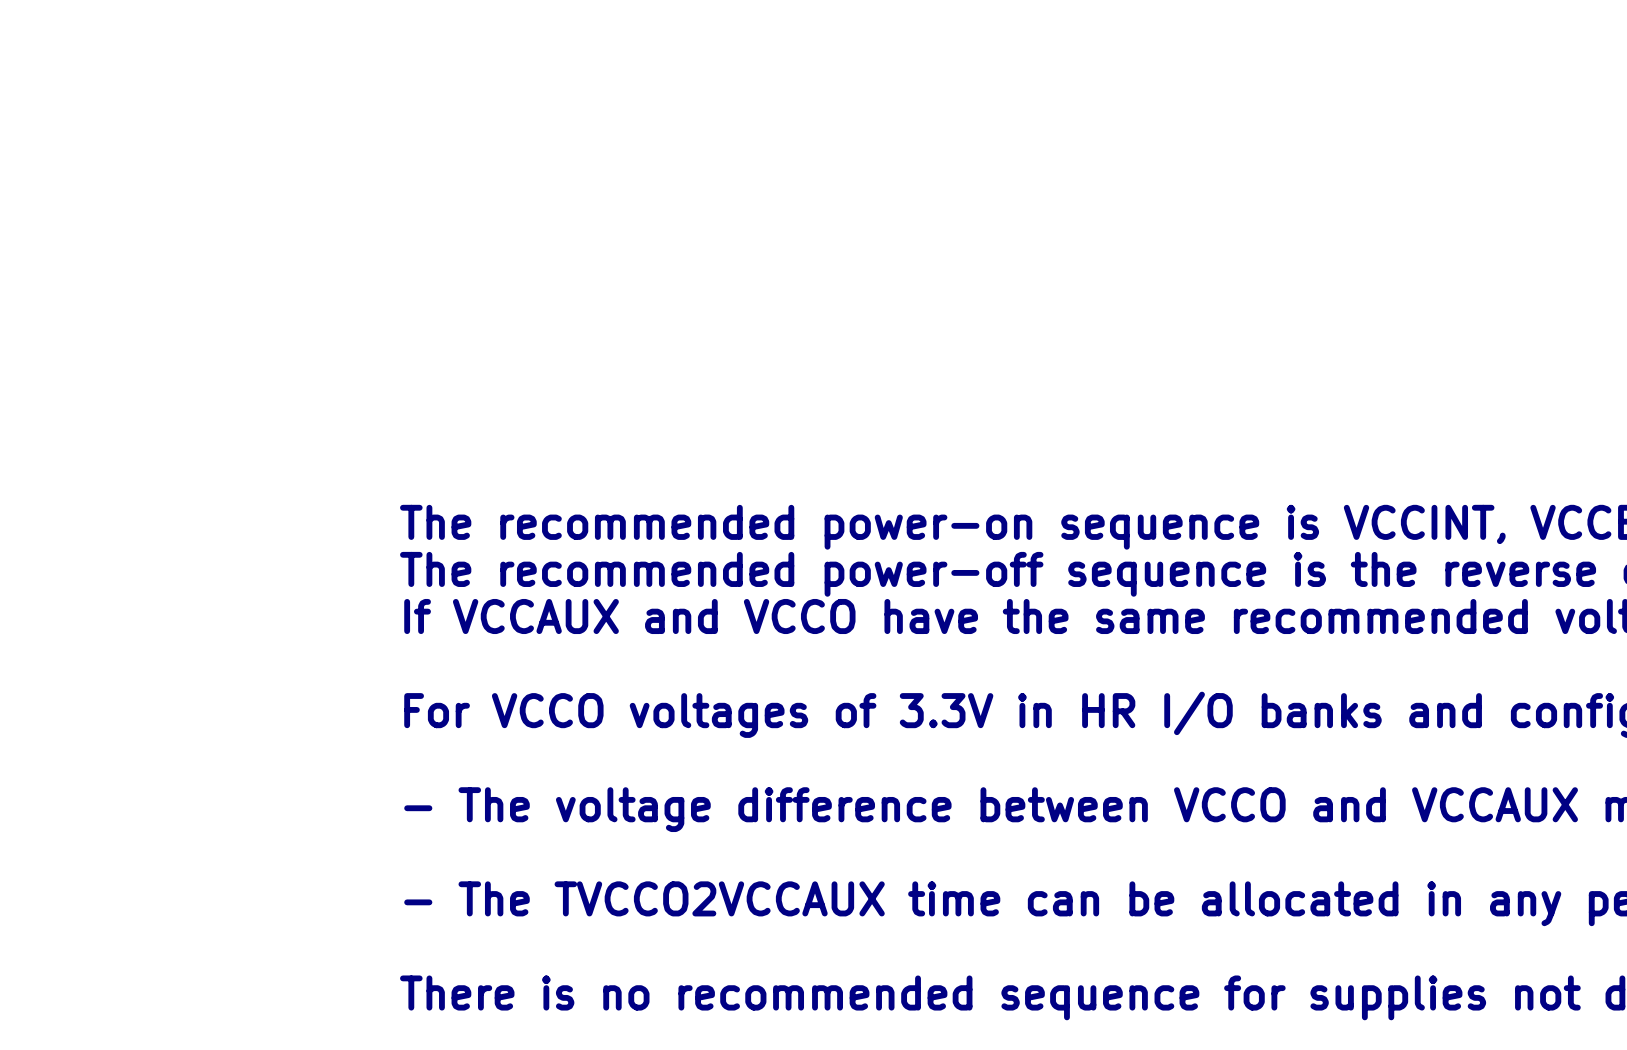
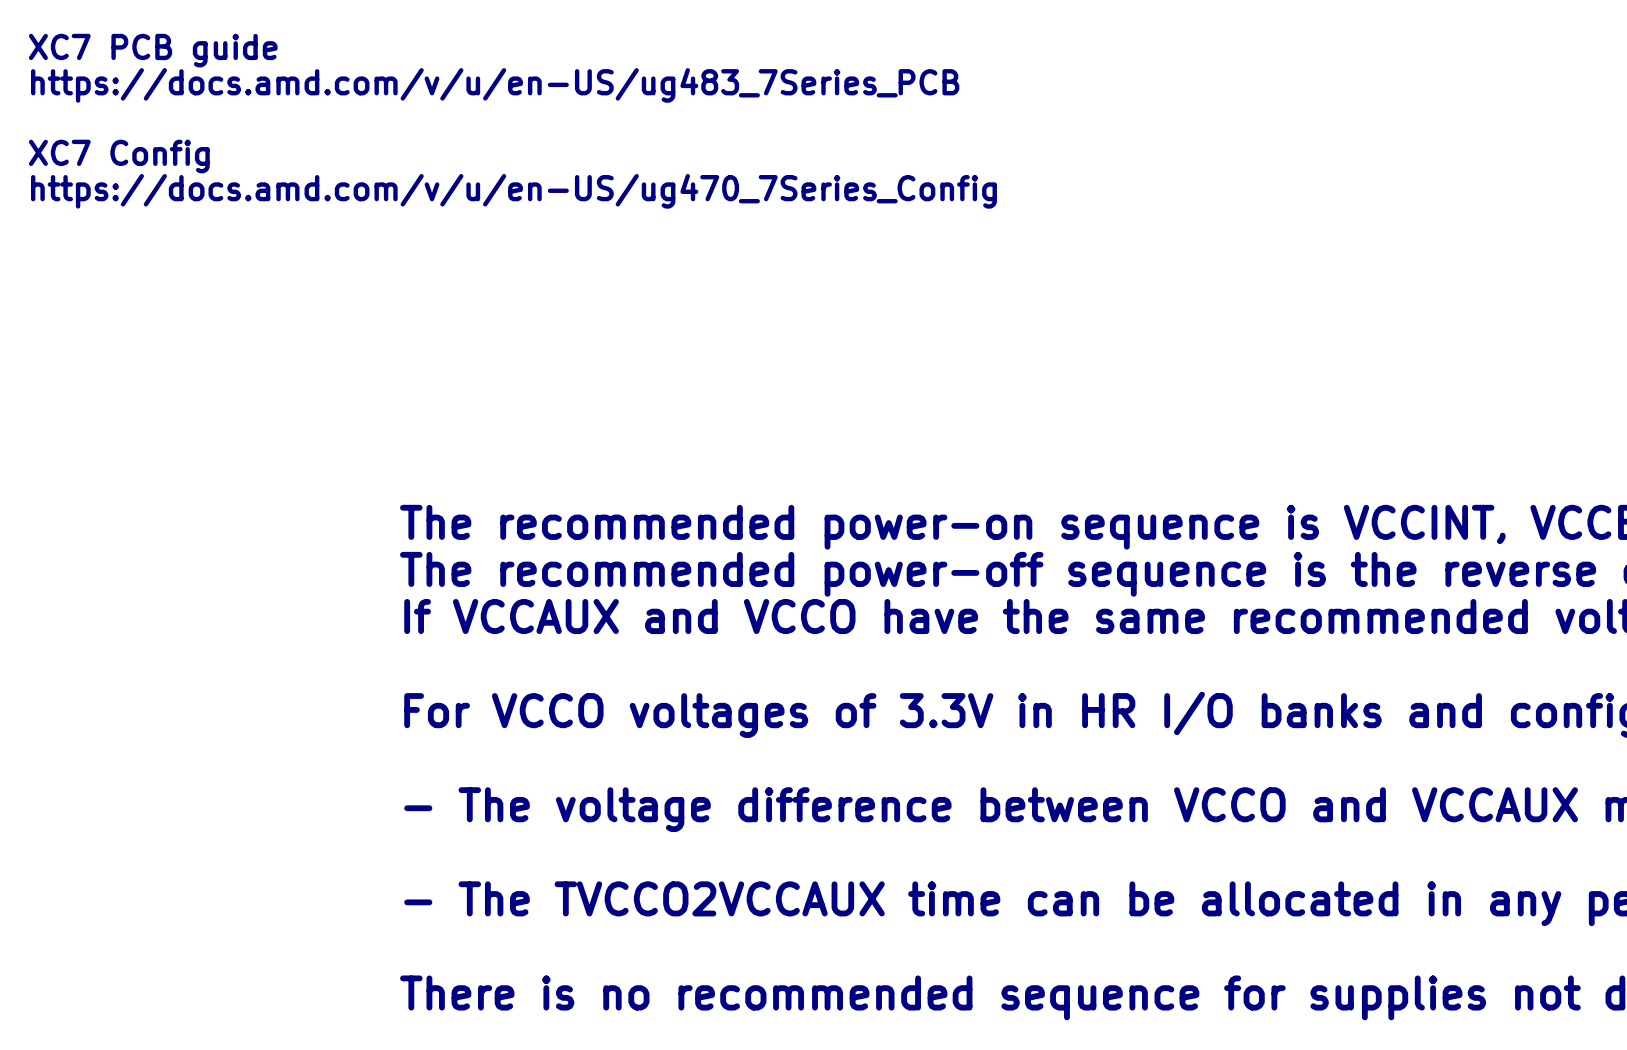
text: none -> XC7 PCB guide (153, 50)
text: none -> https://docs.amd.com/v/u/en-US/ug483_7Series_PCB (495, 85)
text: none -> XC7 Config (119, 156)
text: none -> https://docs.amd.com/v/u/en-US/ug470_7Series_Config (513, 191)

